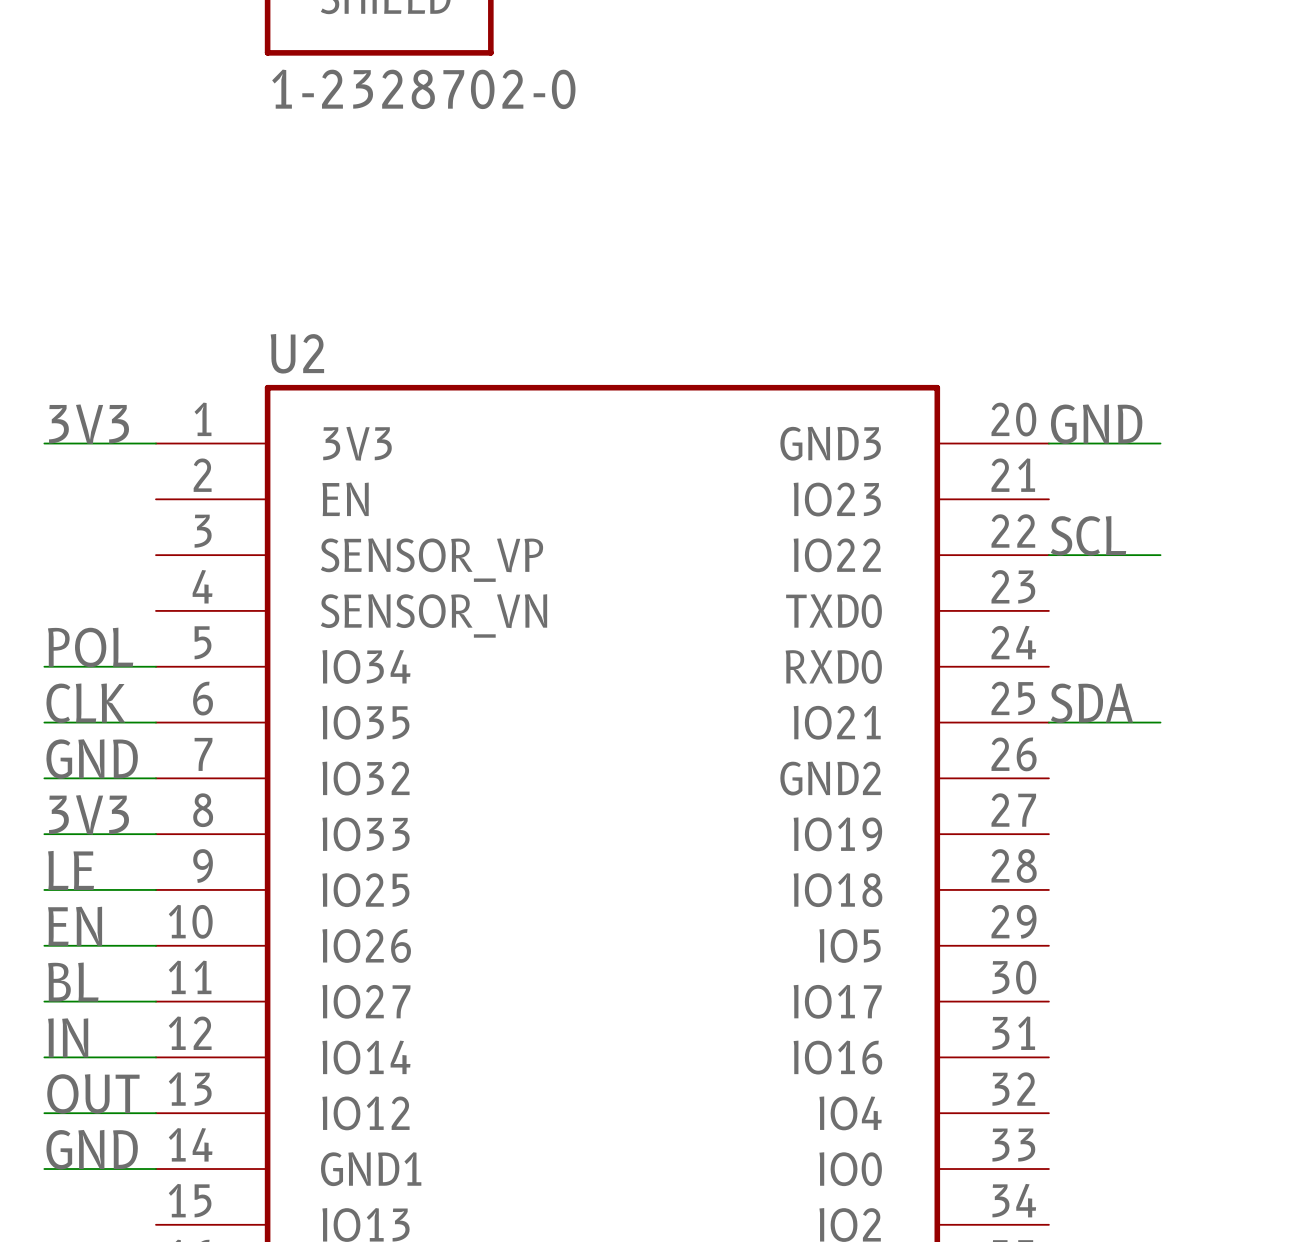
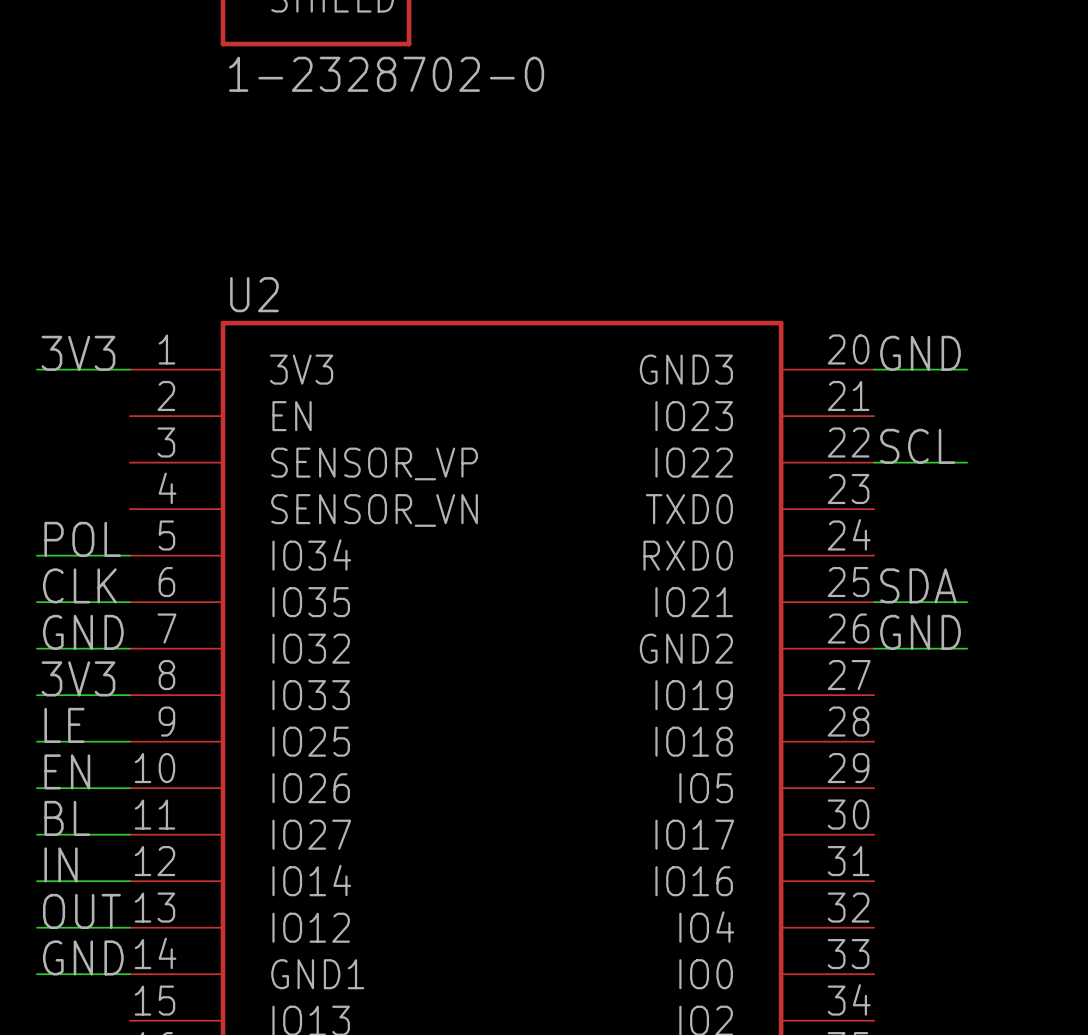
label: none -> GND (920, 632)
wire: none -> (874, 648) (967, 648)

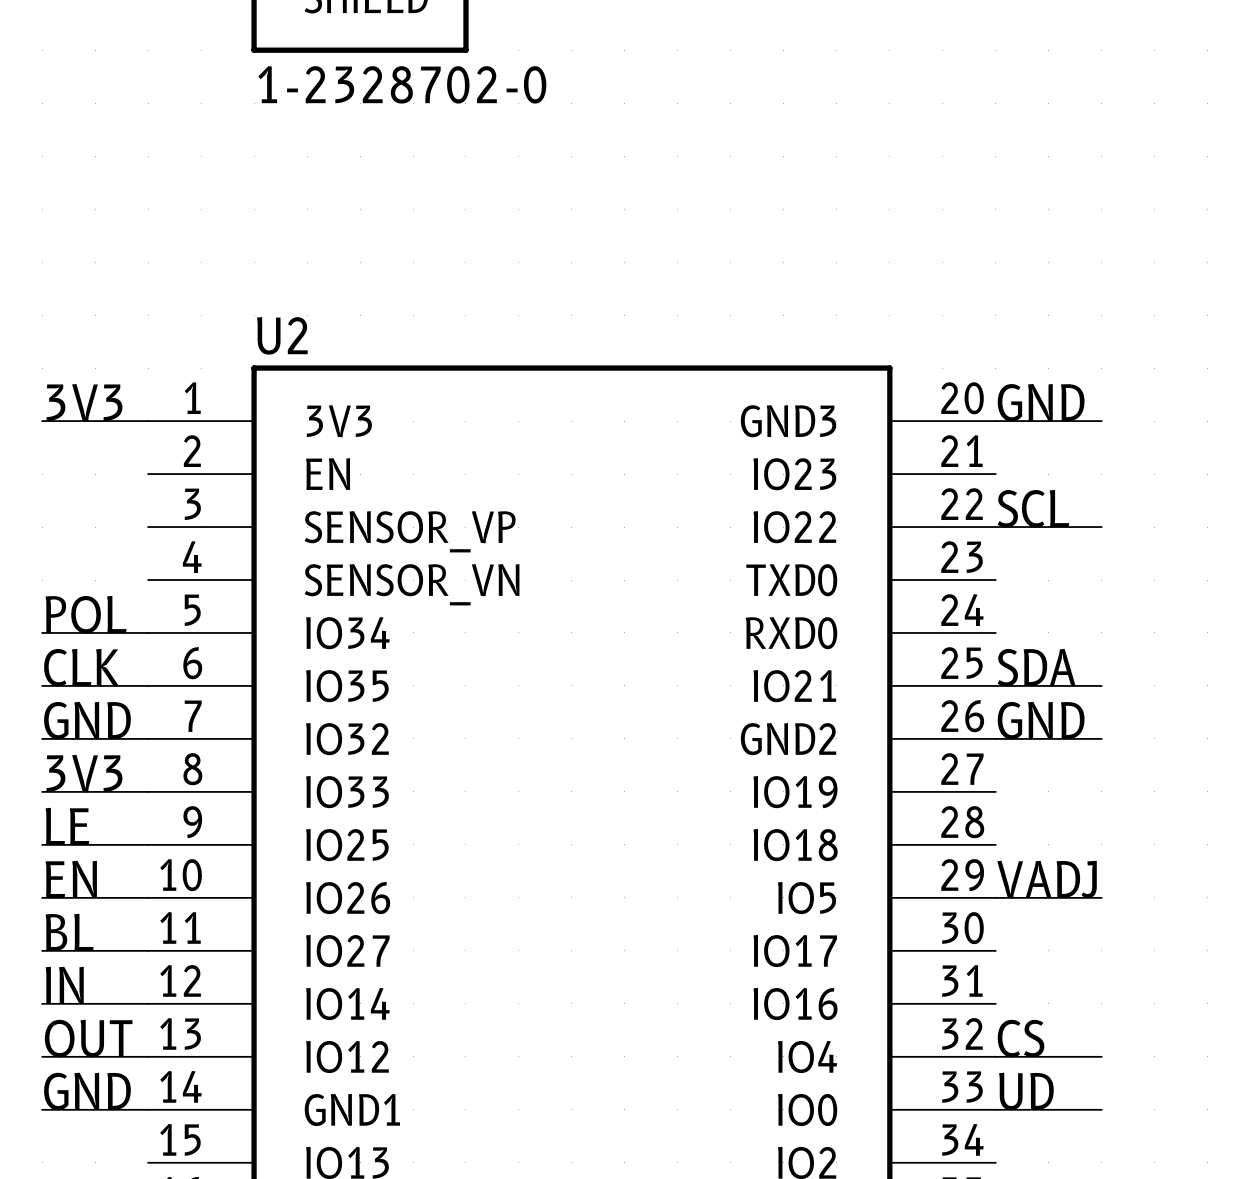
label: none -> VADJ (1047, 879)
wire: none -> (995, 897) (1101, 897)
label: none -> CS (1021, 1038)
wire: none -> (995, 1056) (1101, 1056)
label: none -> UD (1026, 1091)
wire: none -> (995, 1109) (1101, 1109)

